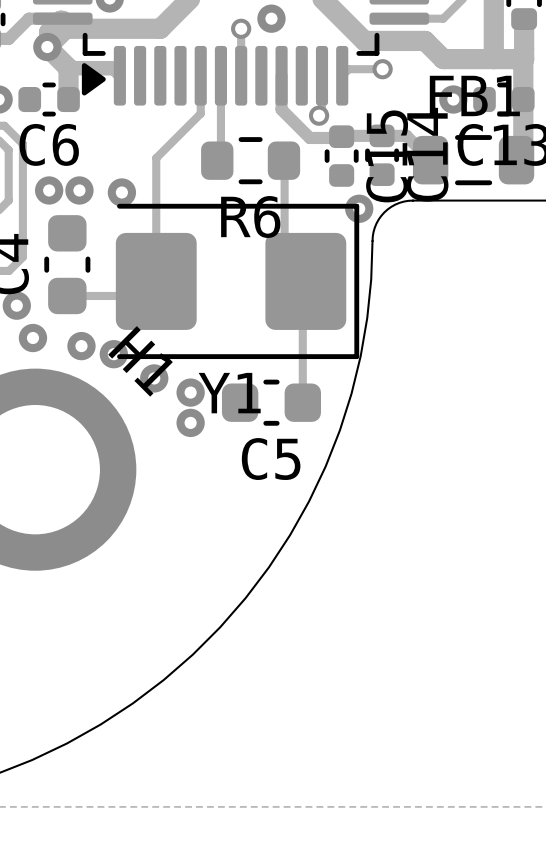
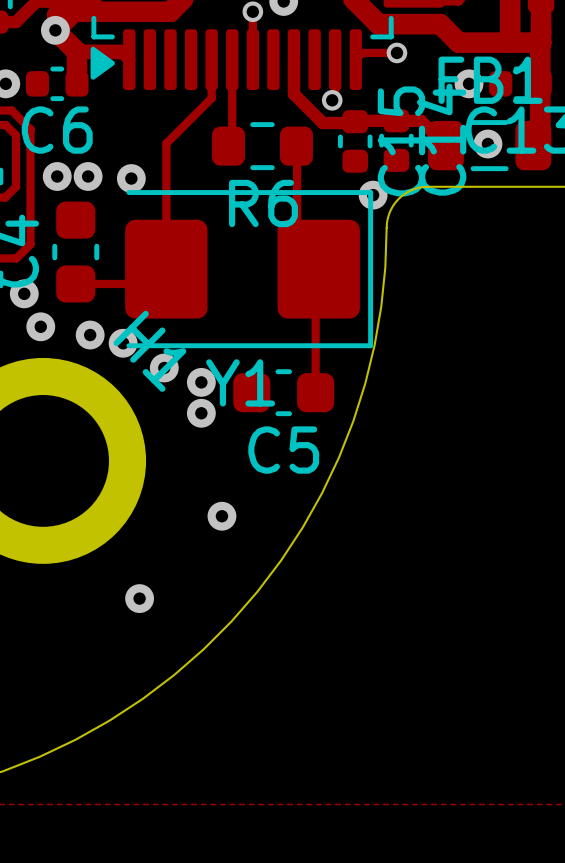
via: none -> (487, 144)
via: none -> (221, 516)
via: none -> (139, 598)

